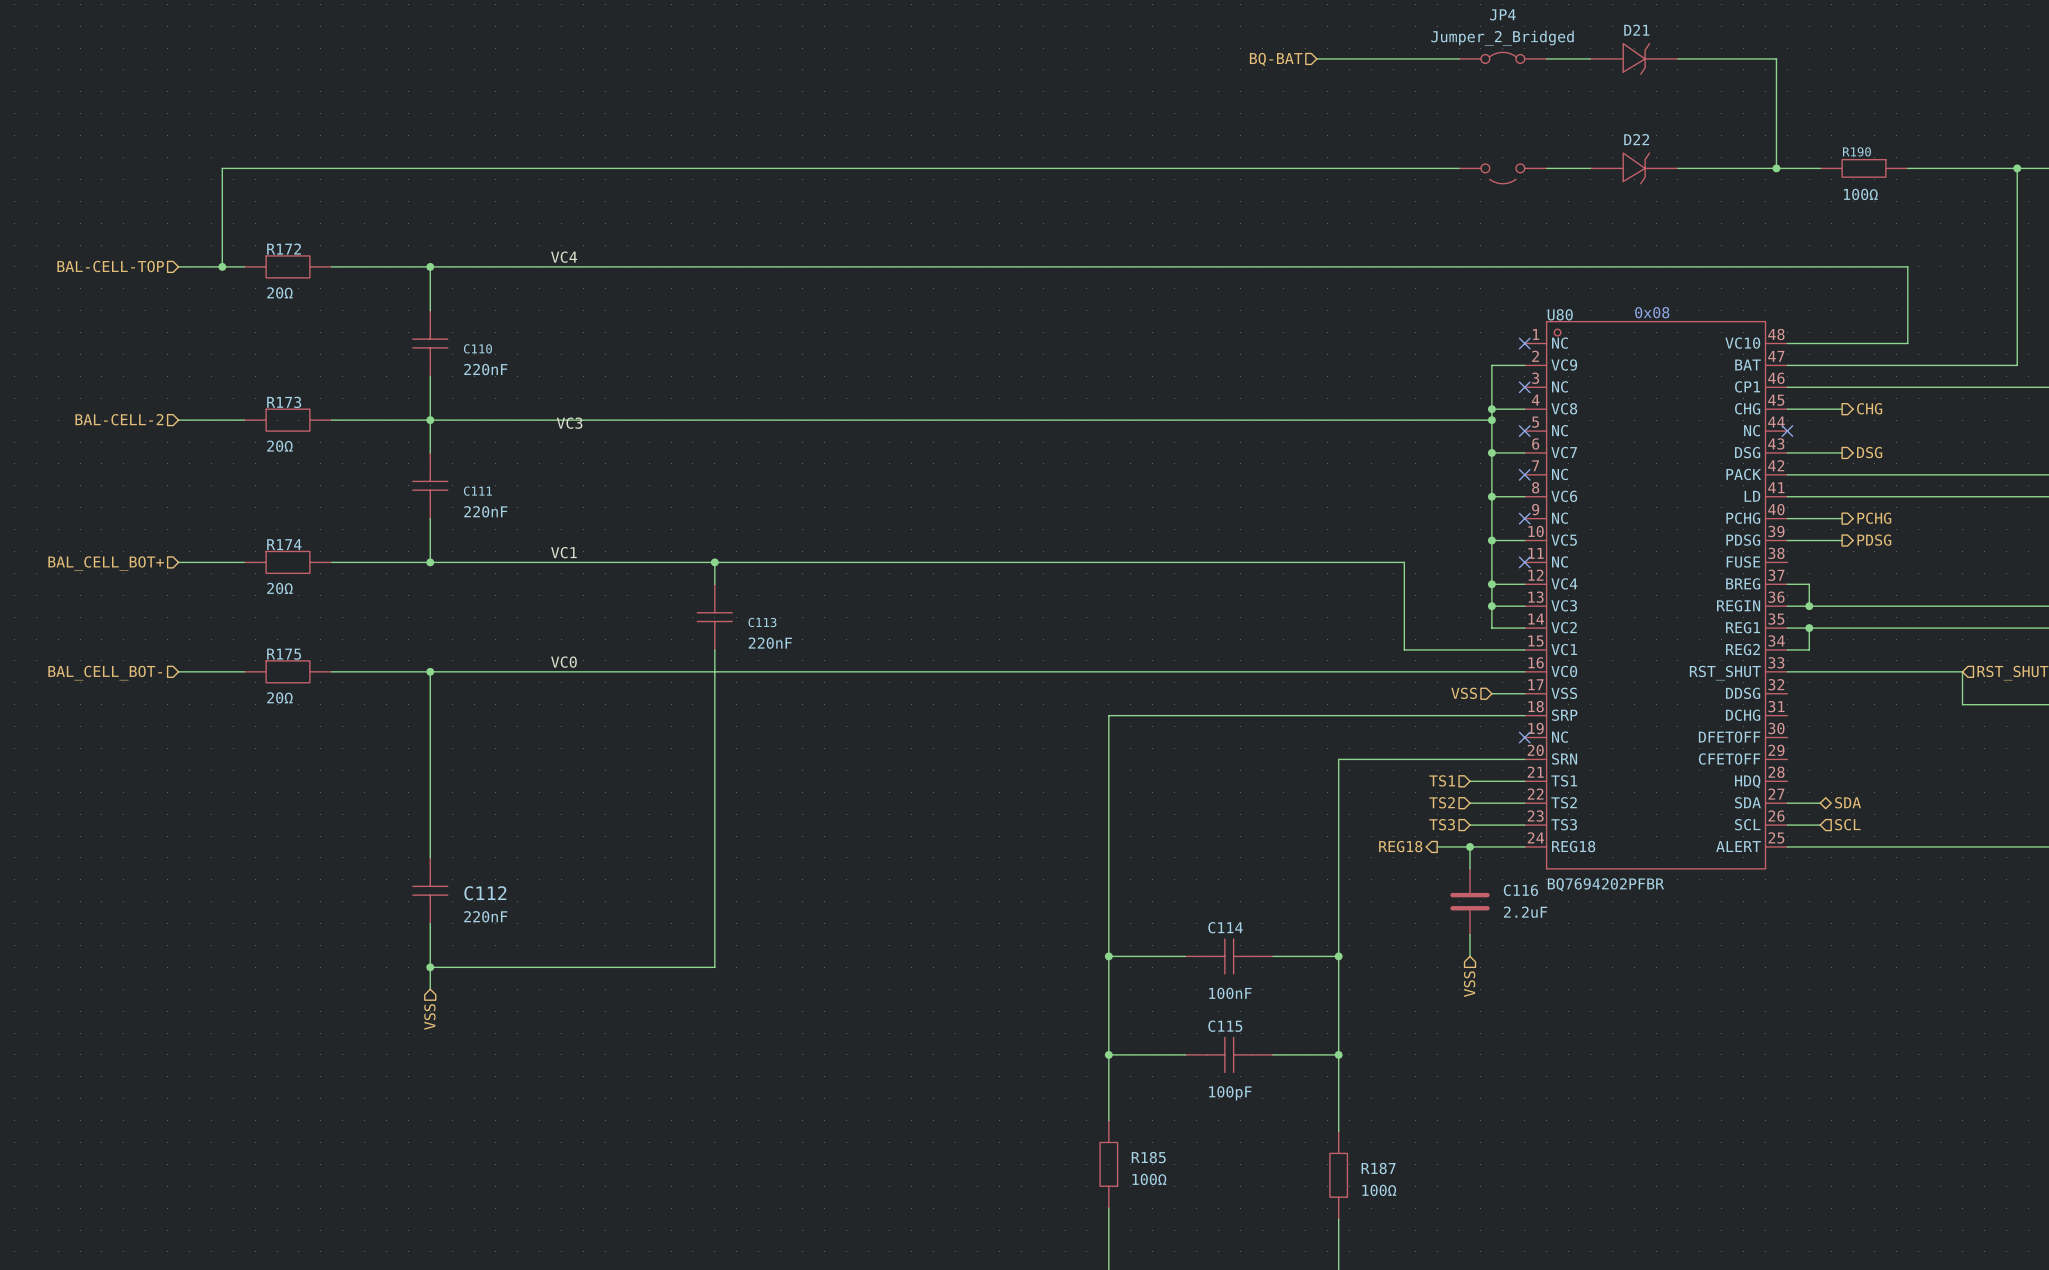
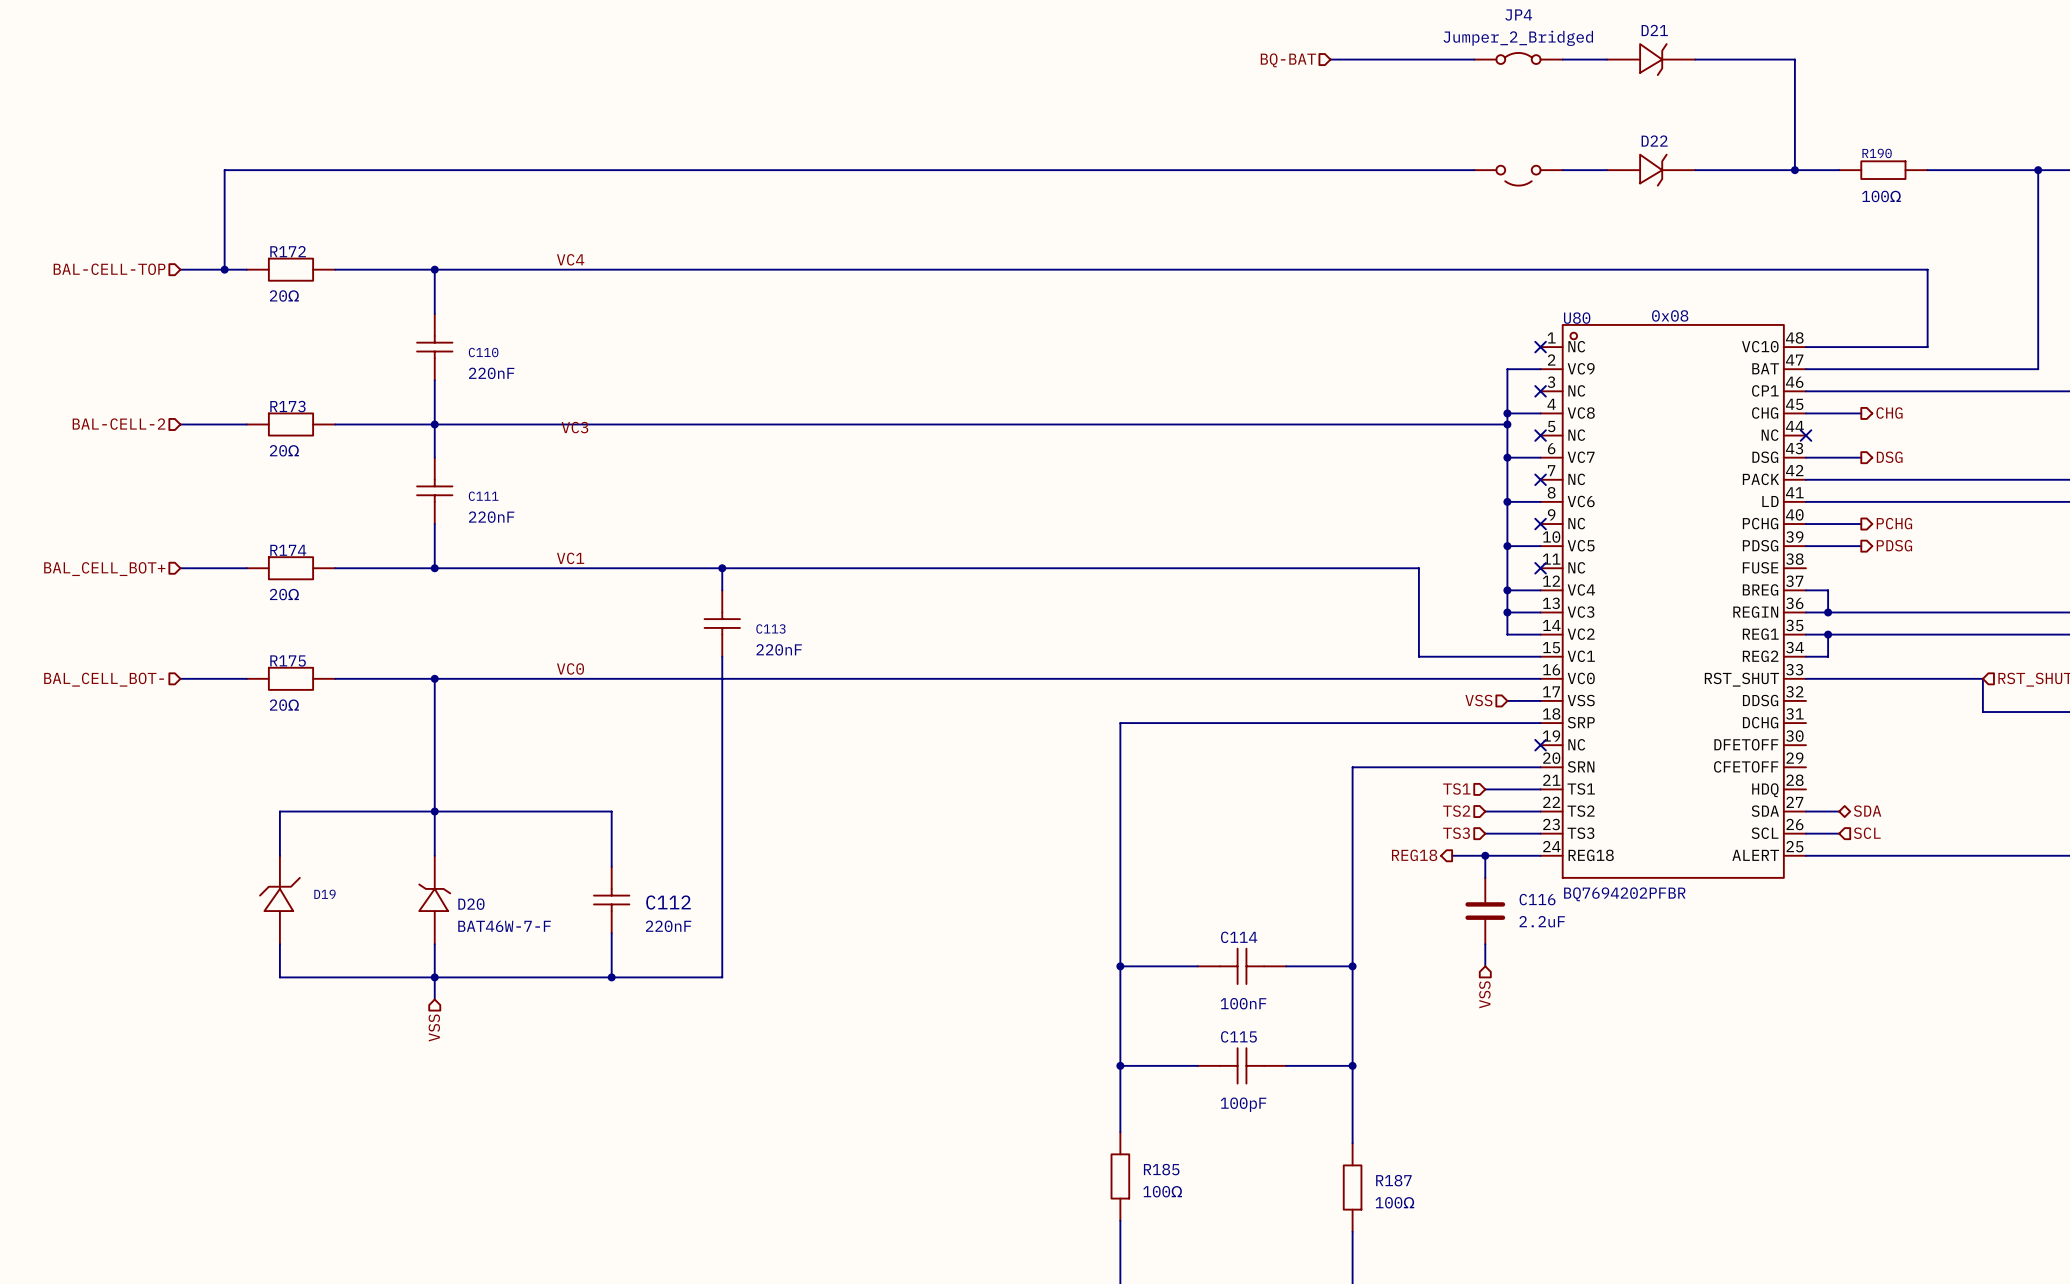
junction: none -> (434, 811)
wire: none -> (279, 855) (279, 811) (611, 811) (611, 866)
D19: none -> (279, 900)
C112 position: (430, 890) -> (611, 900)
D20: none -> BAT46W-7-F (434, 900)
wire: none -> (611, 933) (611, 977)
wire: none -> (279, 944) (279, 977) (434, 977)
junction: none -> (611, 977)

